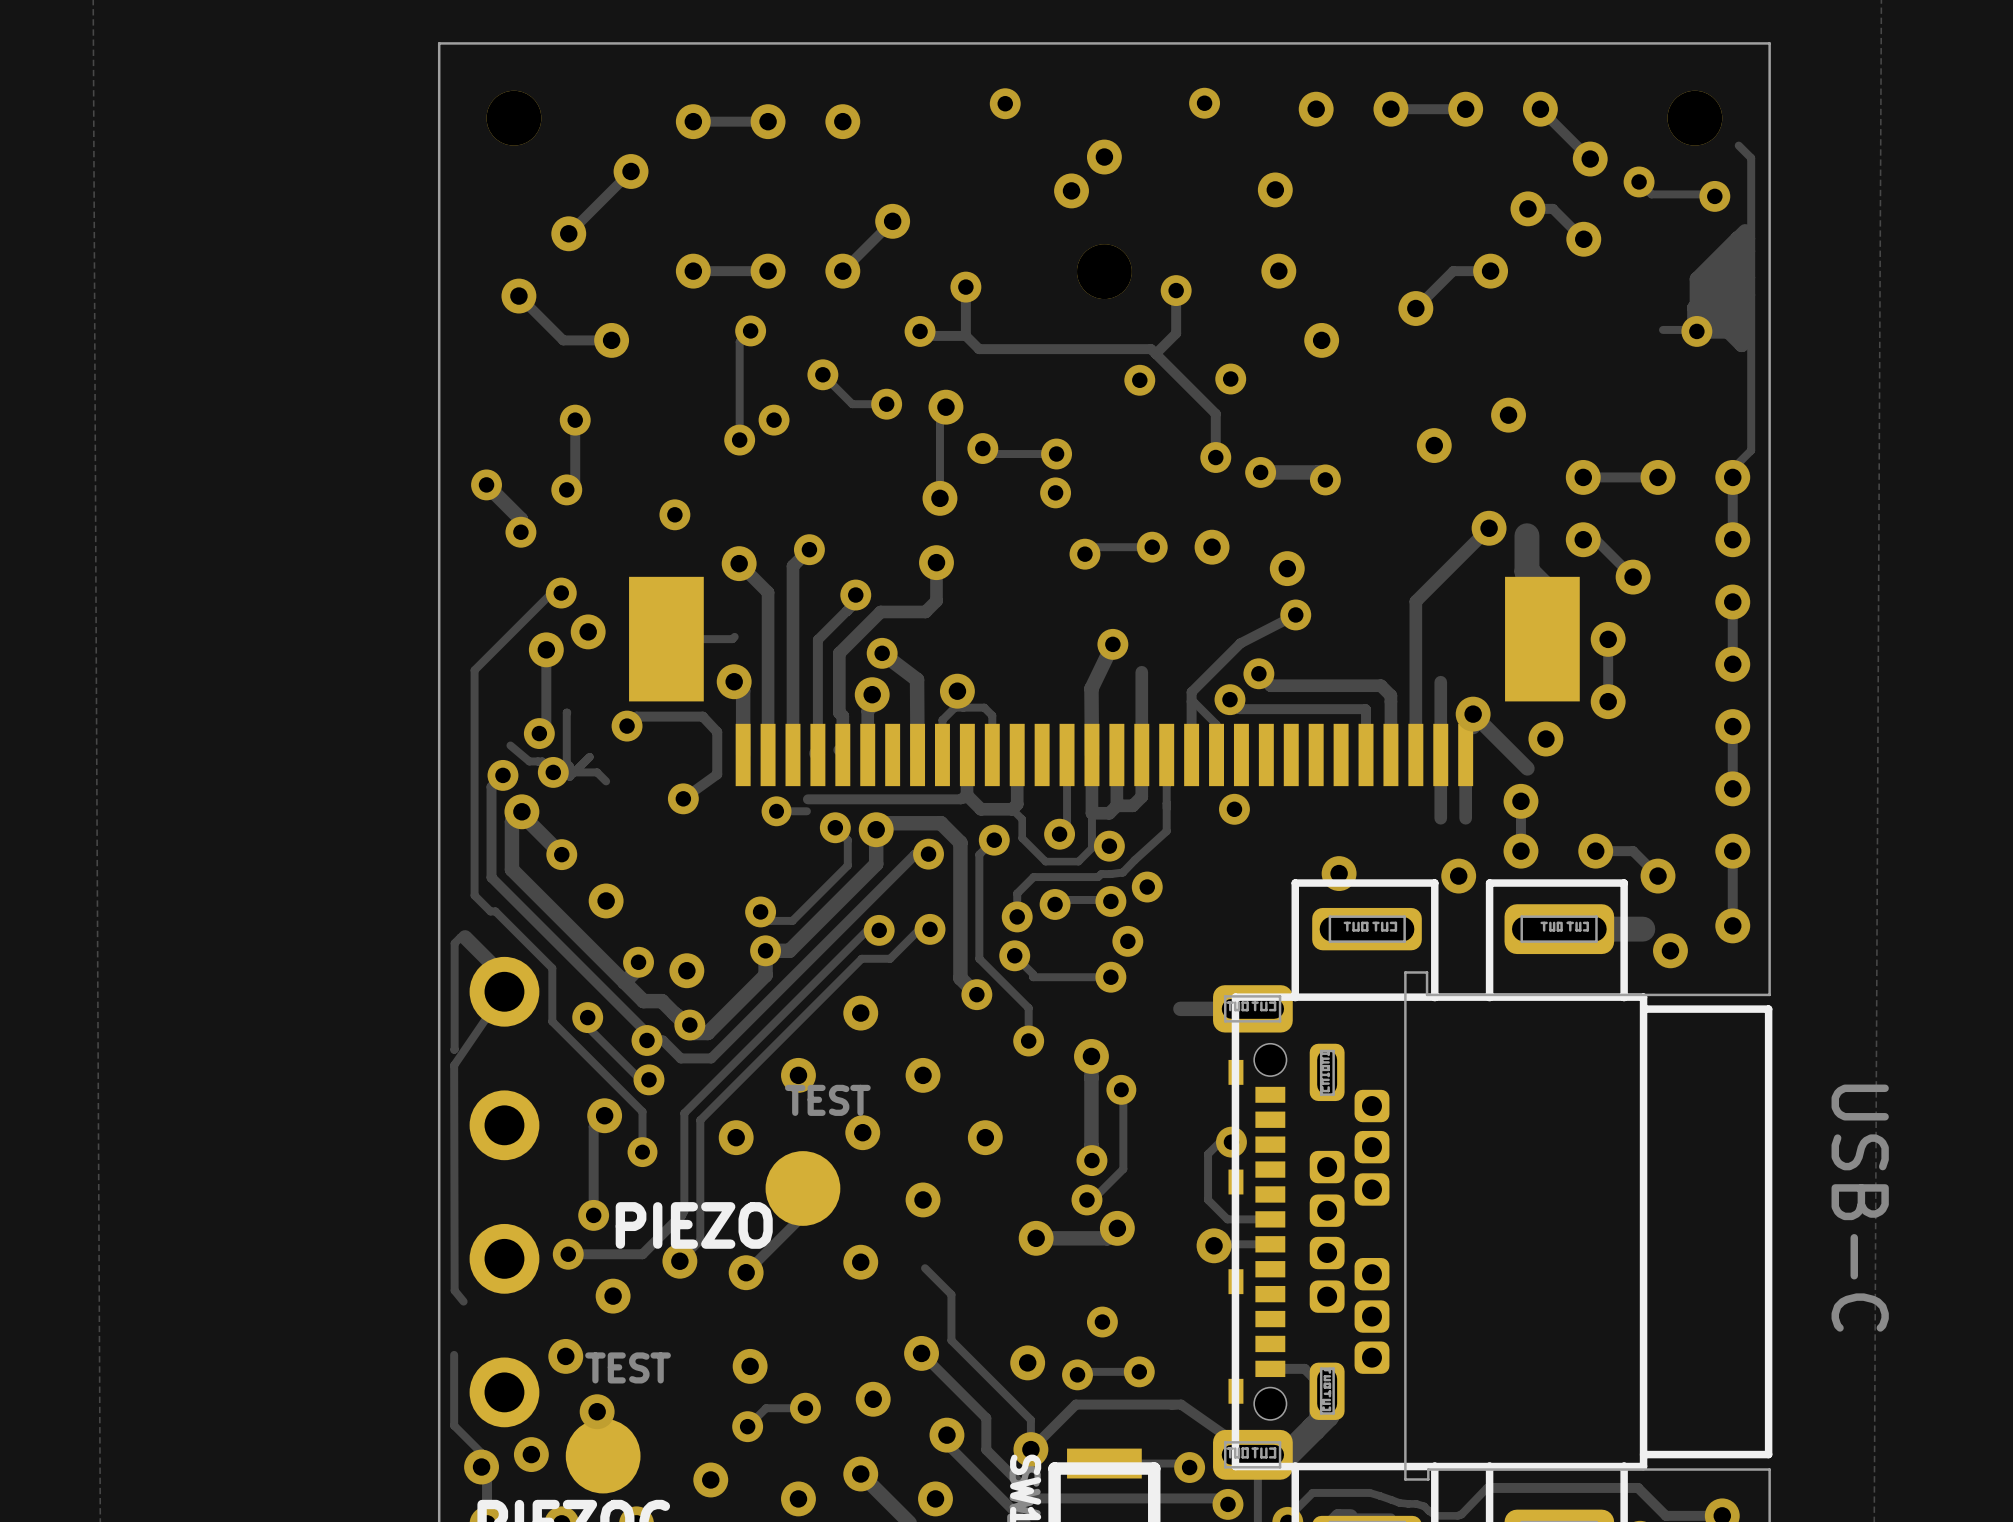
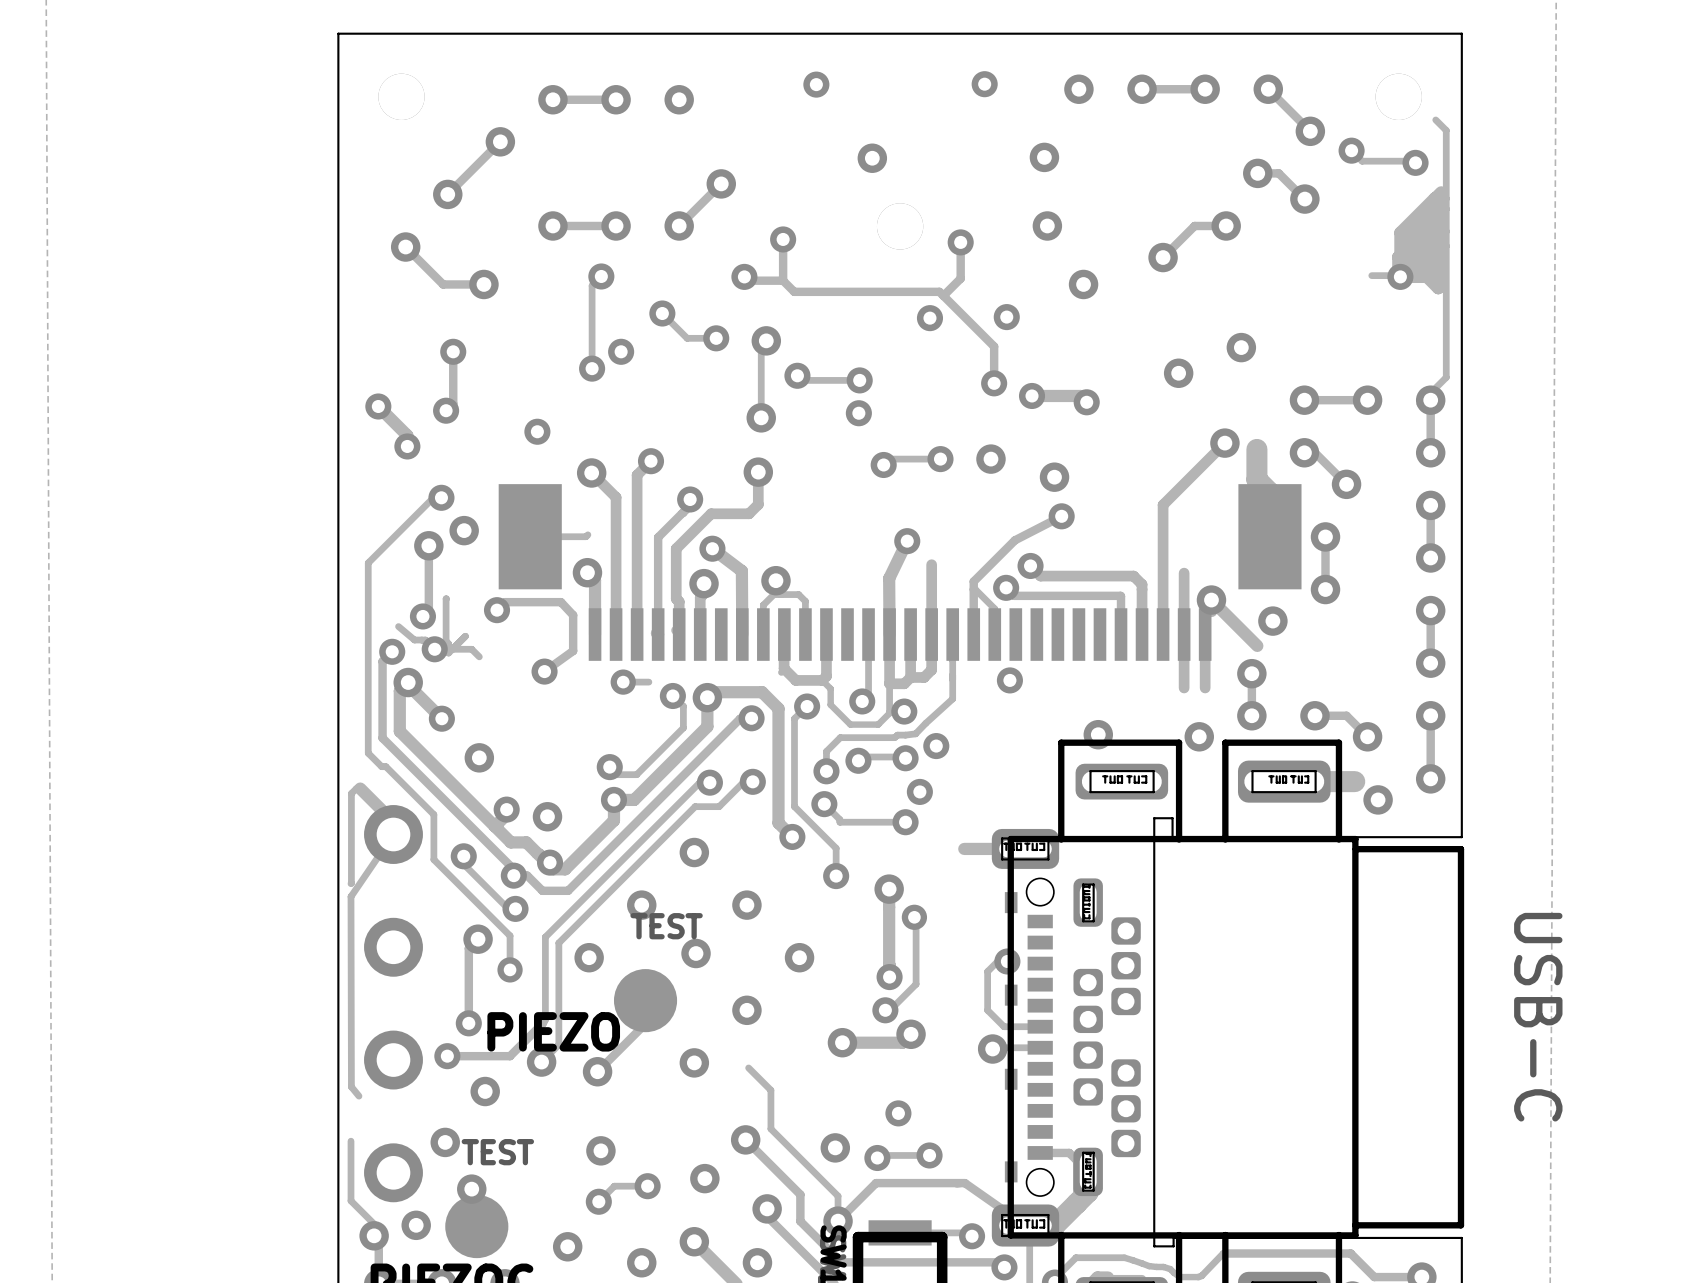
via: (1104, 157) -> none
track: (967, 754) (967, 792) (960, 799) (807, 799) -> none

